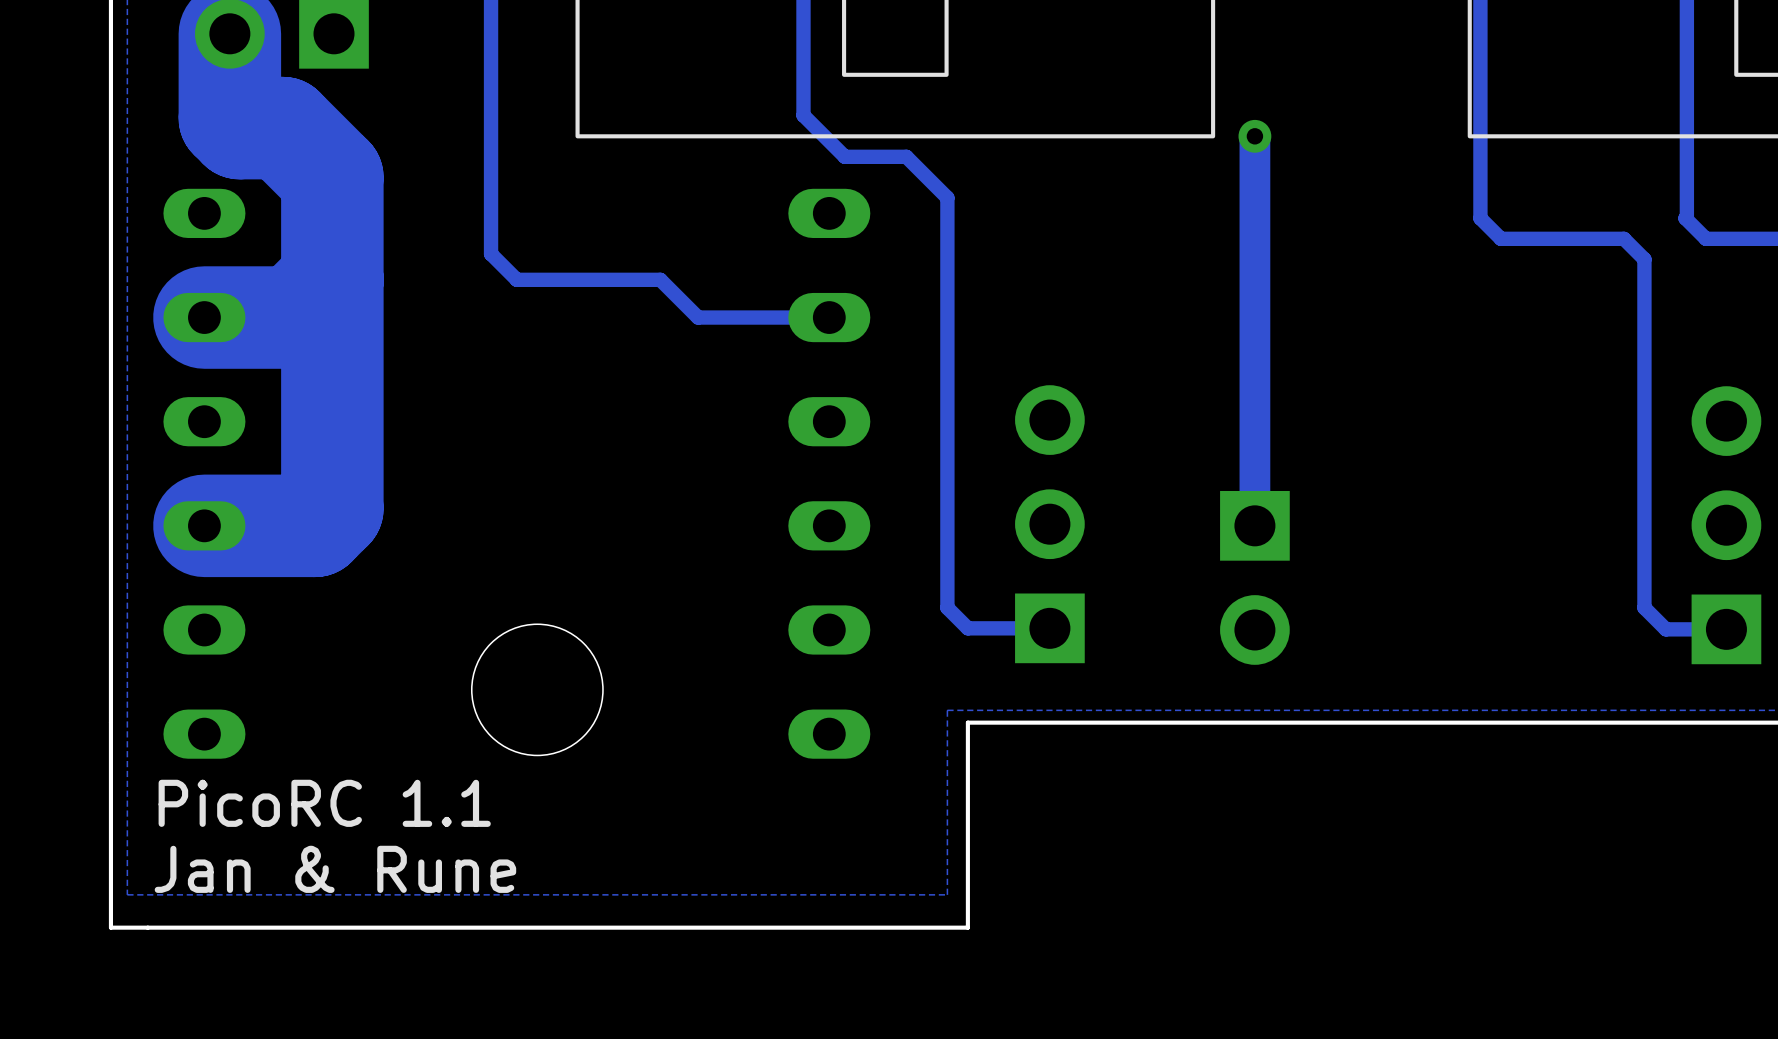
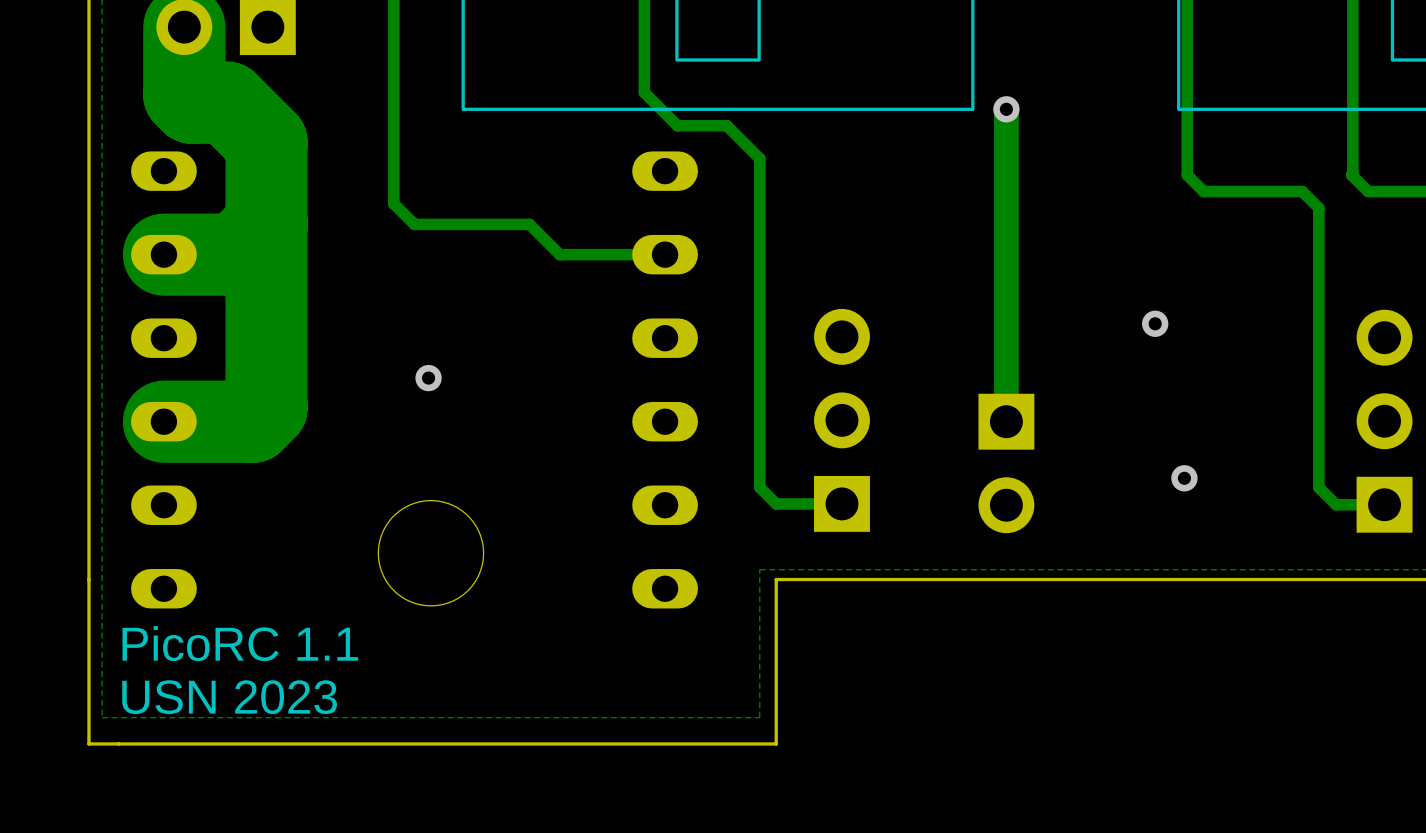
via: none -> (1155, 323)
via: none -> (428, 378)
via: none -> (1184, 478)
text: Jan & Rune (335, 869) -> USN 2023 (229, 697)

